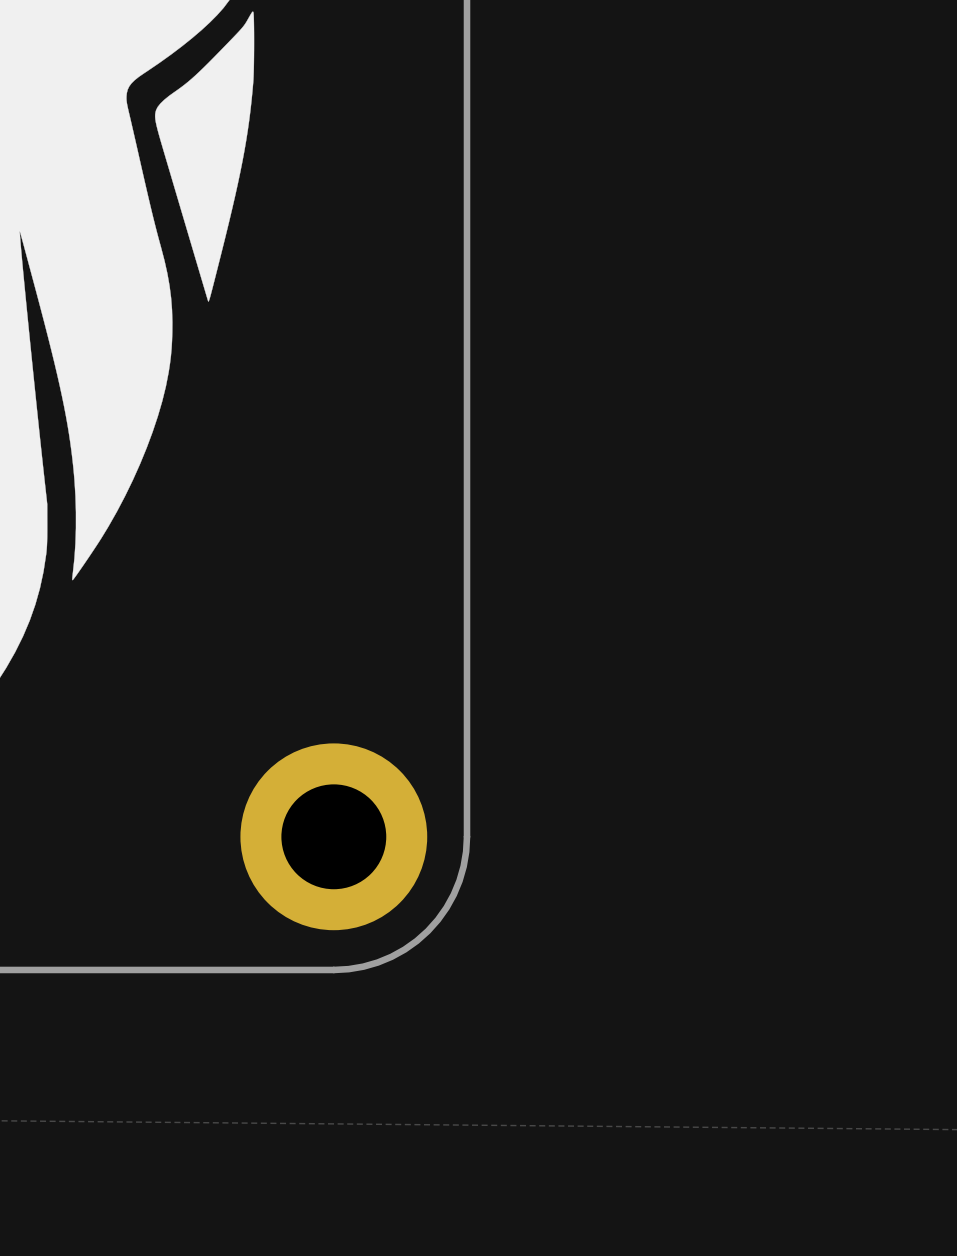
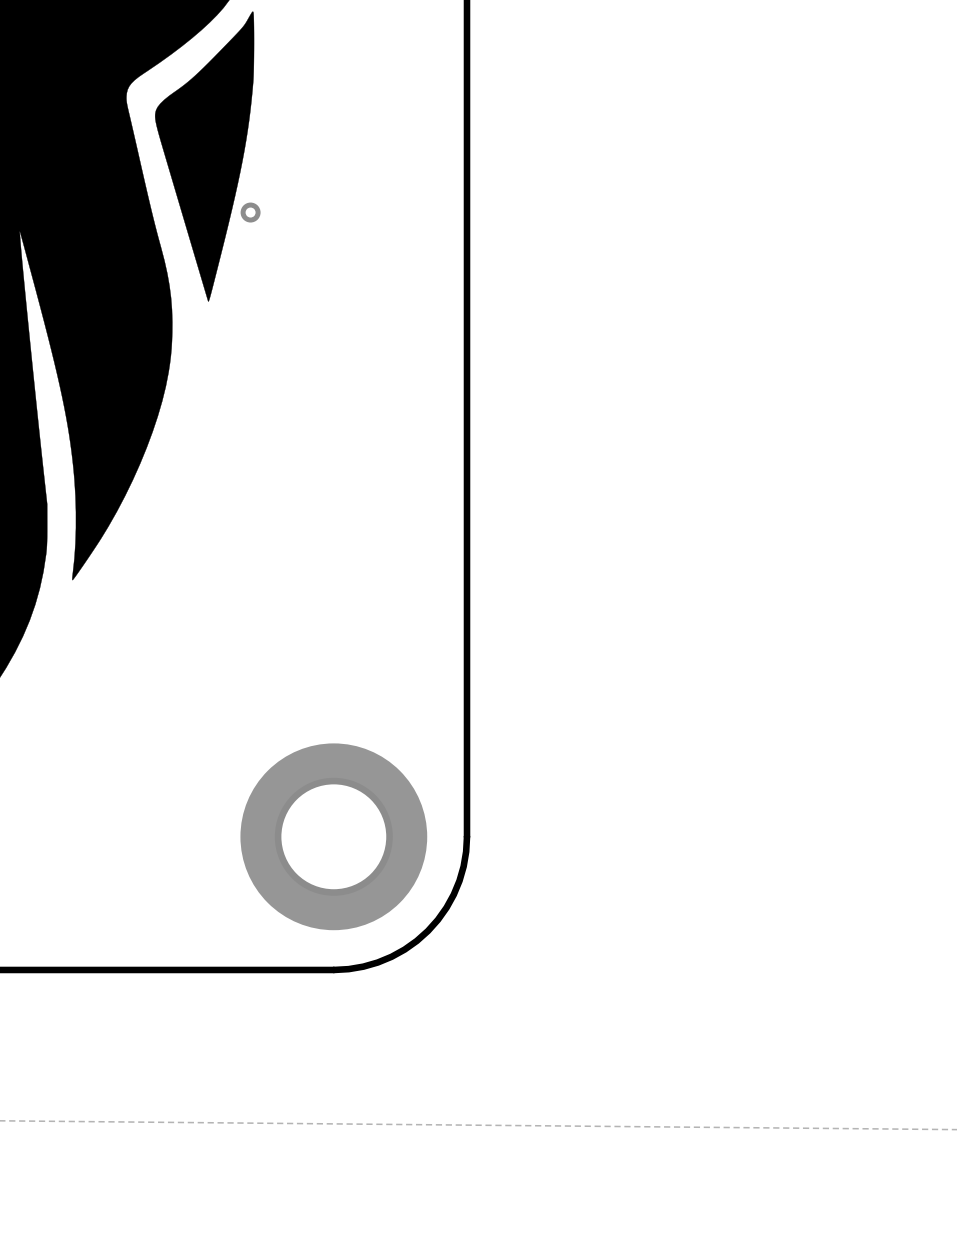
via: none -> (250, 212)

